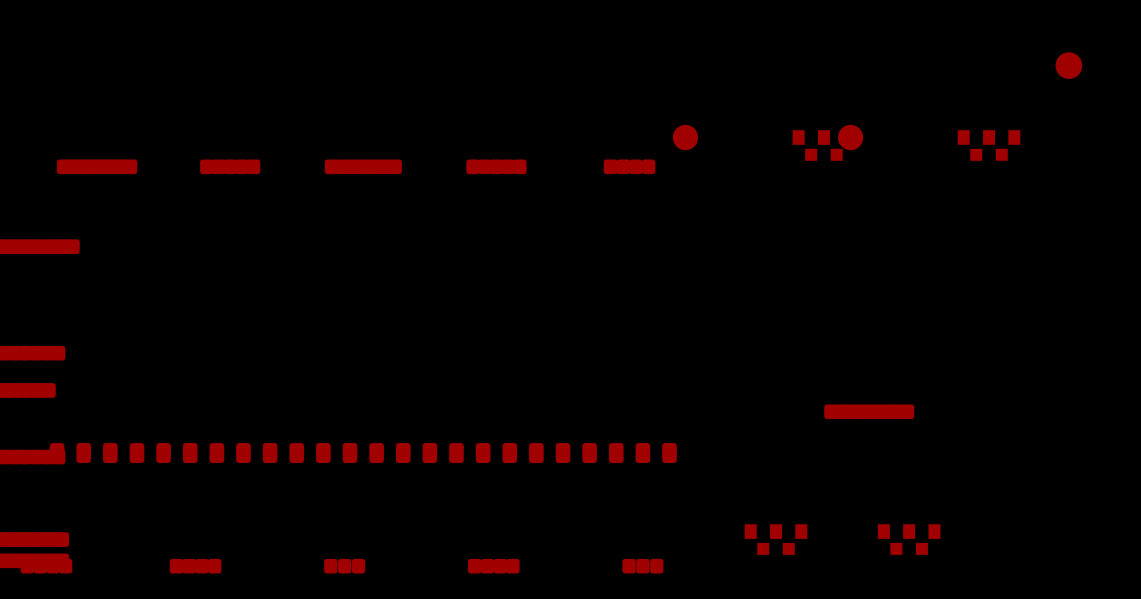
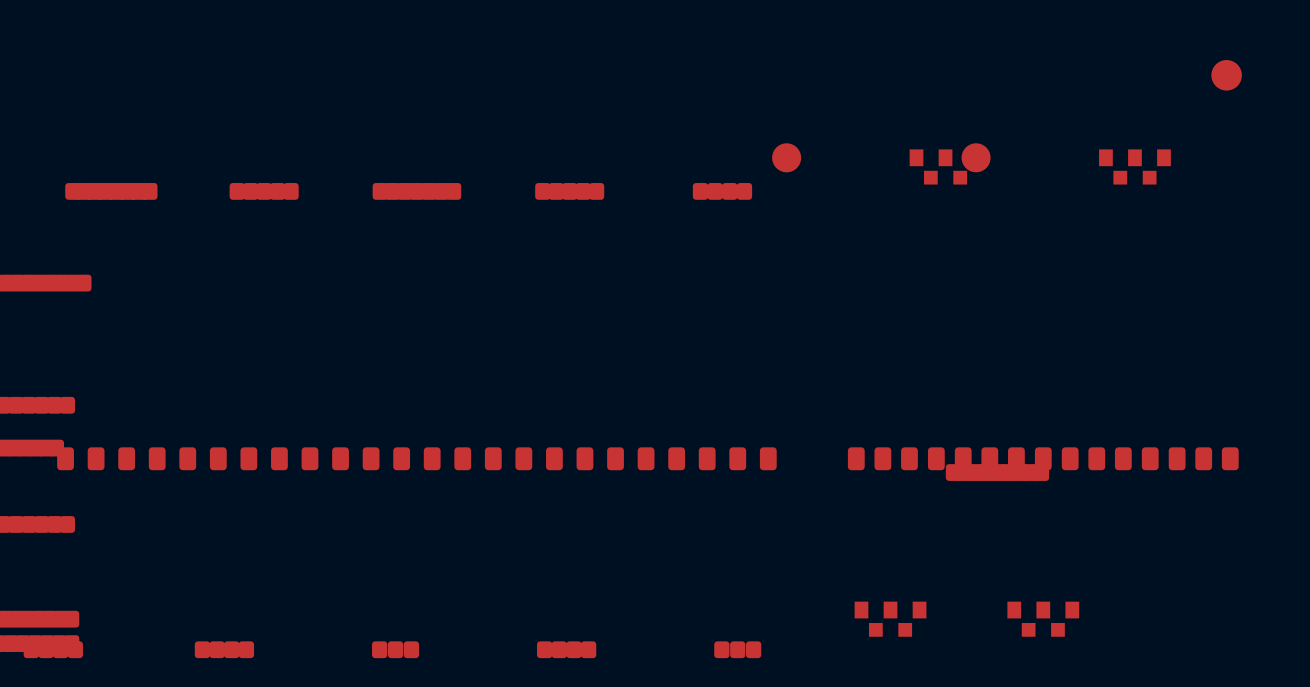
part: none -> (1043, 458)
part position: (363, 453) -> (416, 458)

